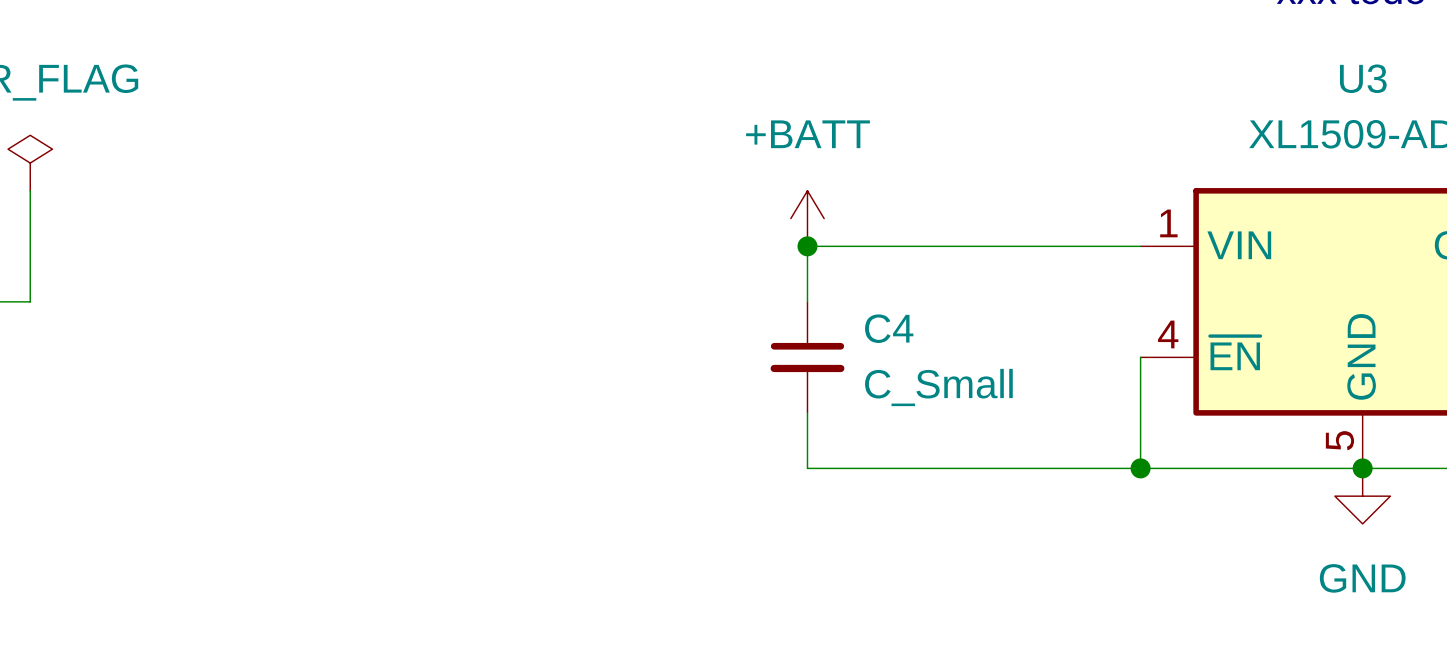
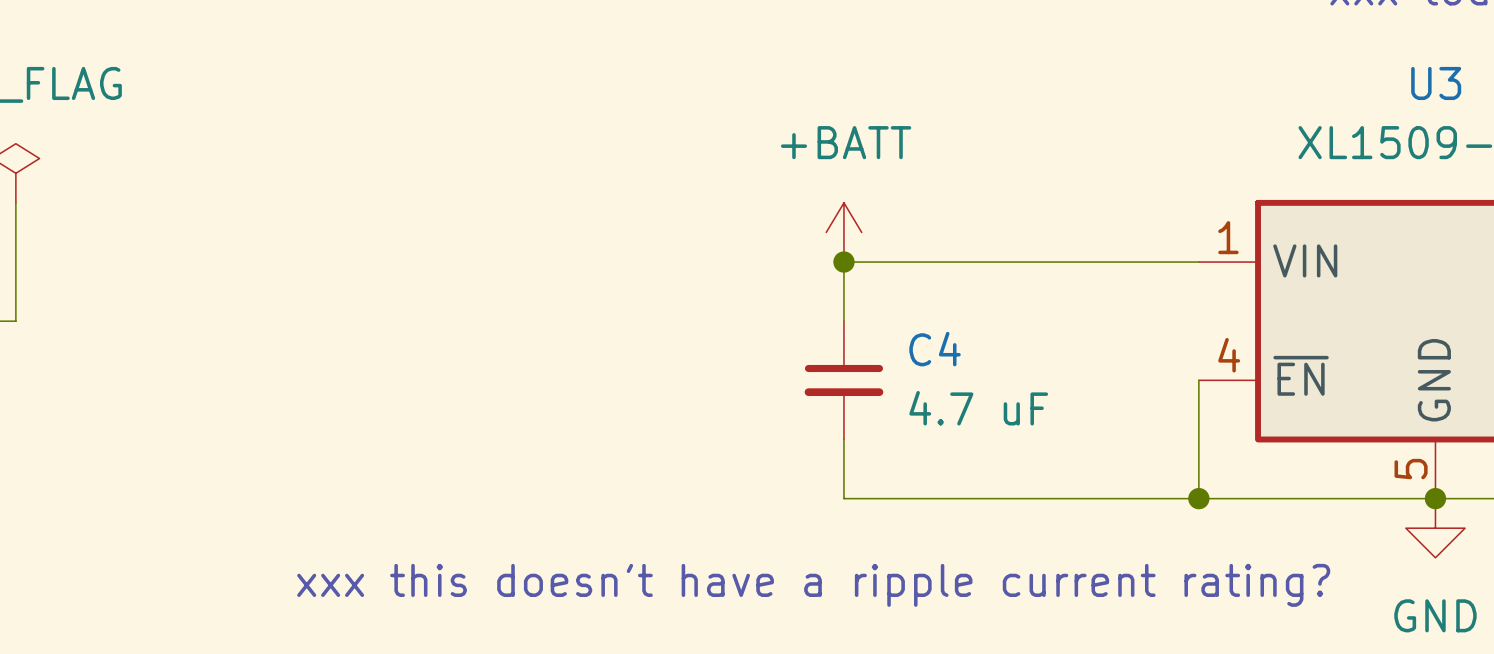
C4 value: C_Small (938, 387) -> 4.7 uF (978, 408)
text: none -> xxx this doesn't have a ripple current rating? (813, 585)

